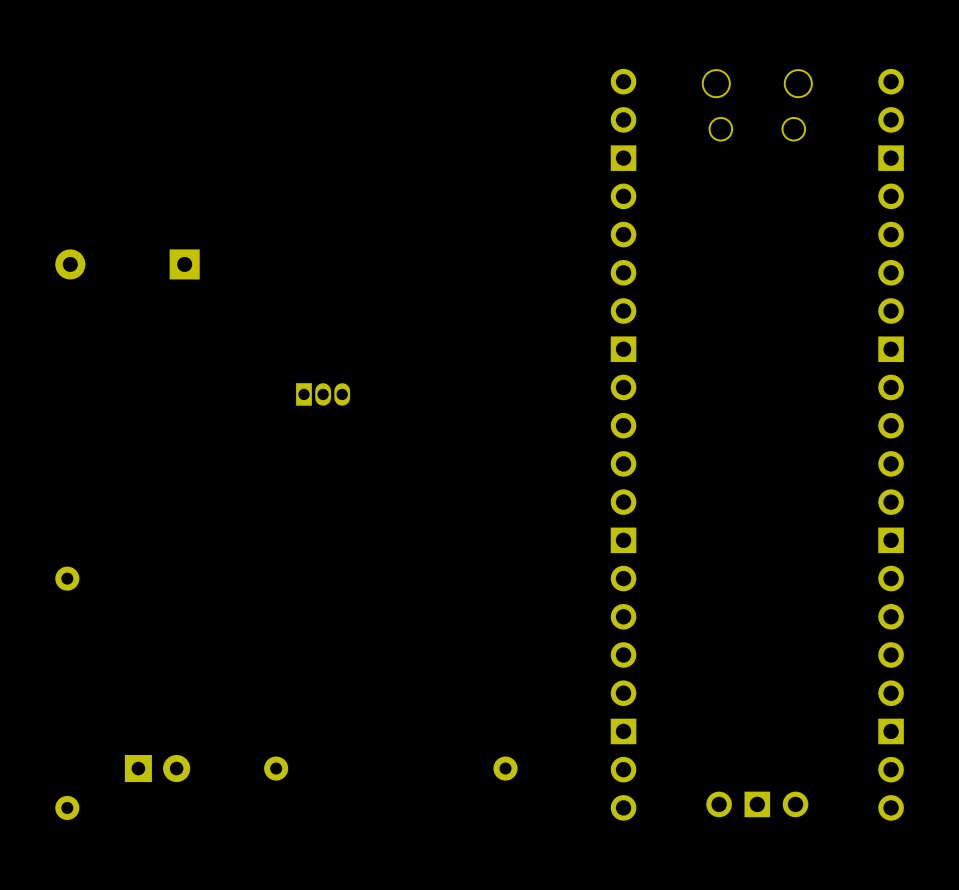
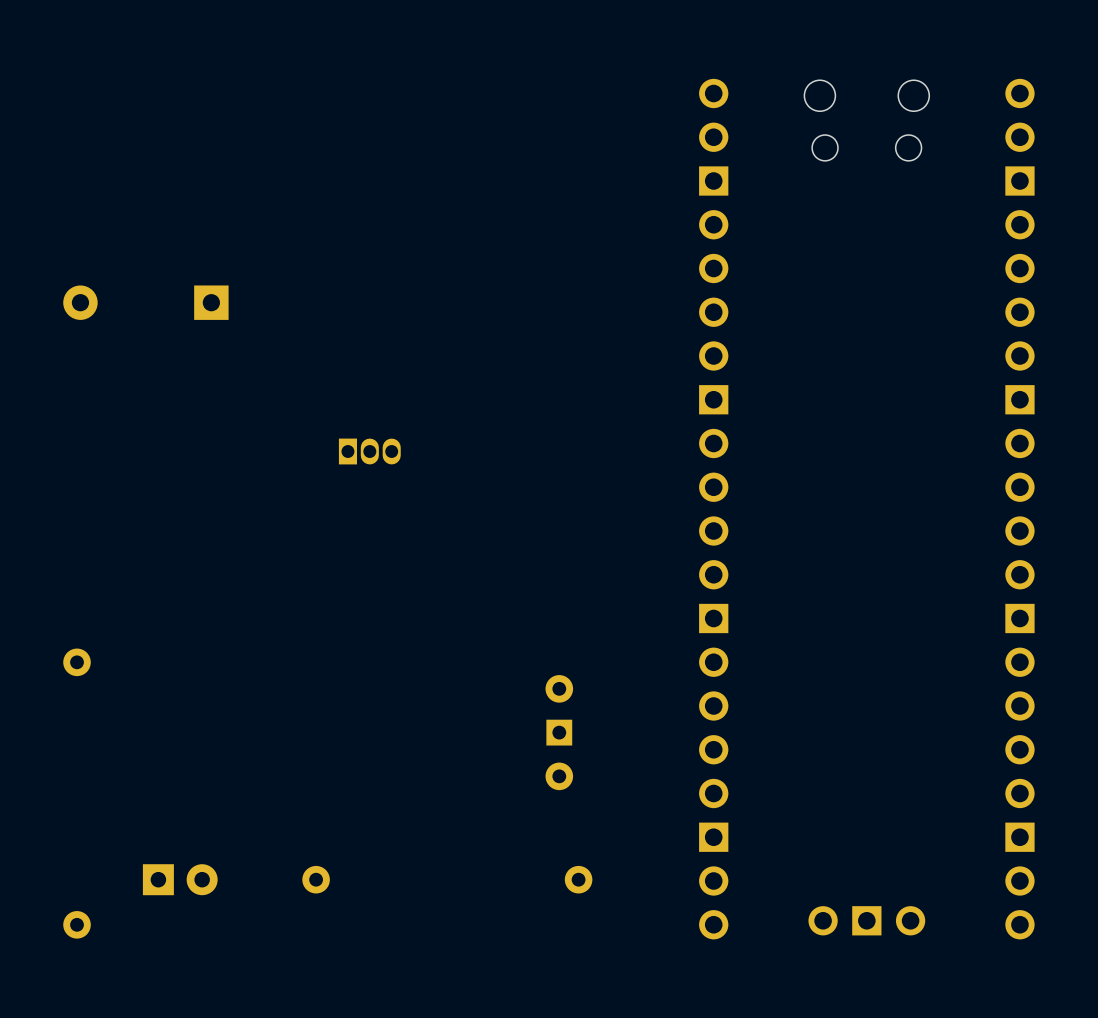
part: none -> (559, 732)

